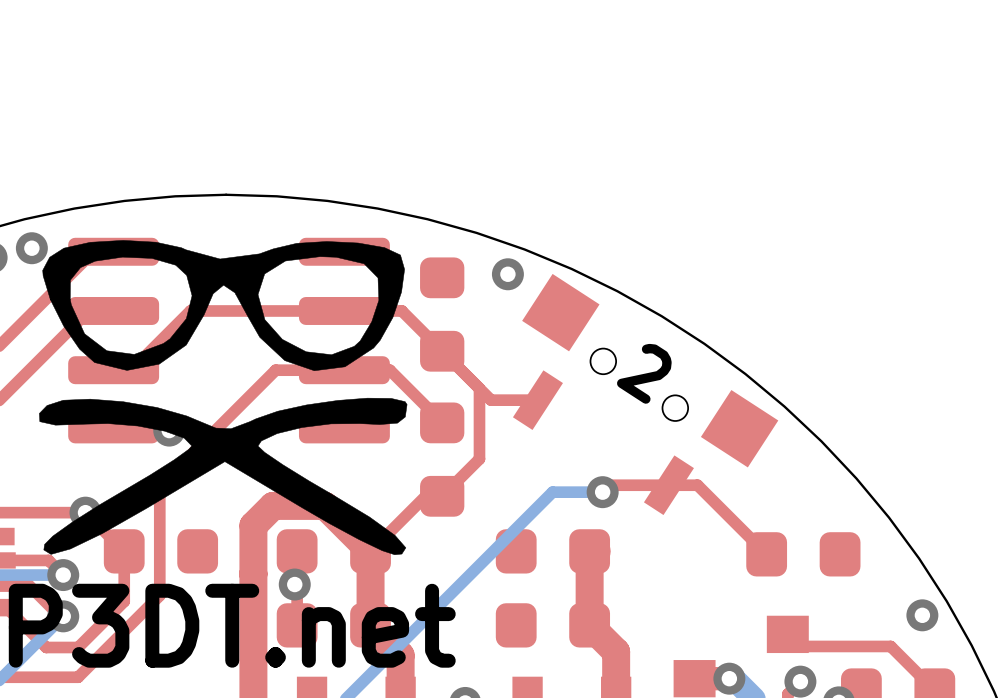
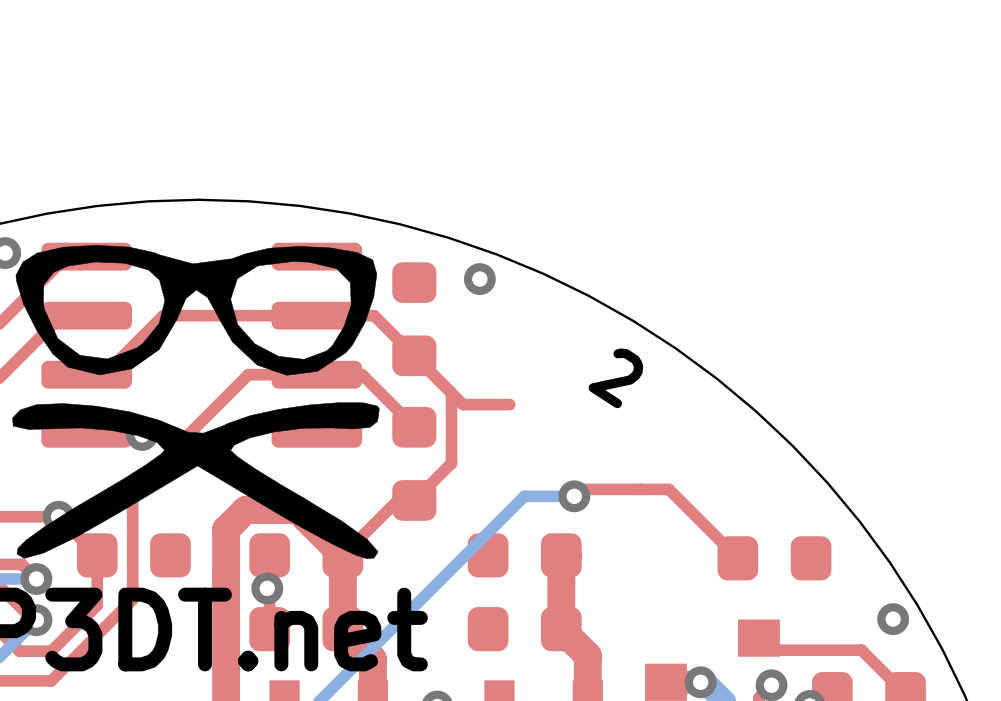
part: (645, 394) -> none

